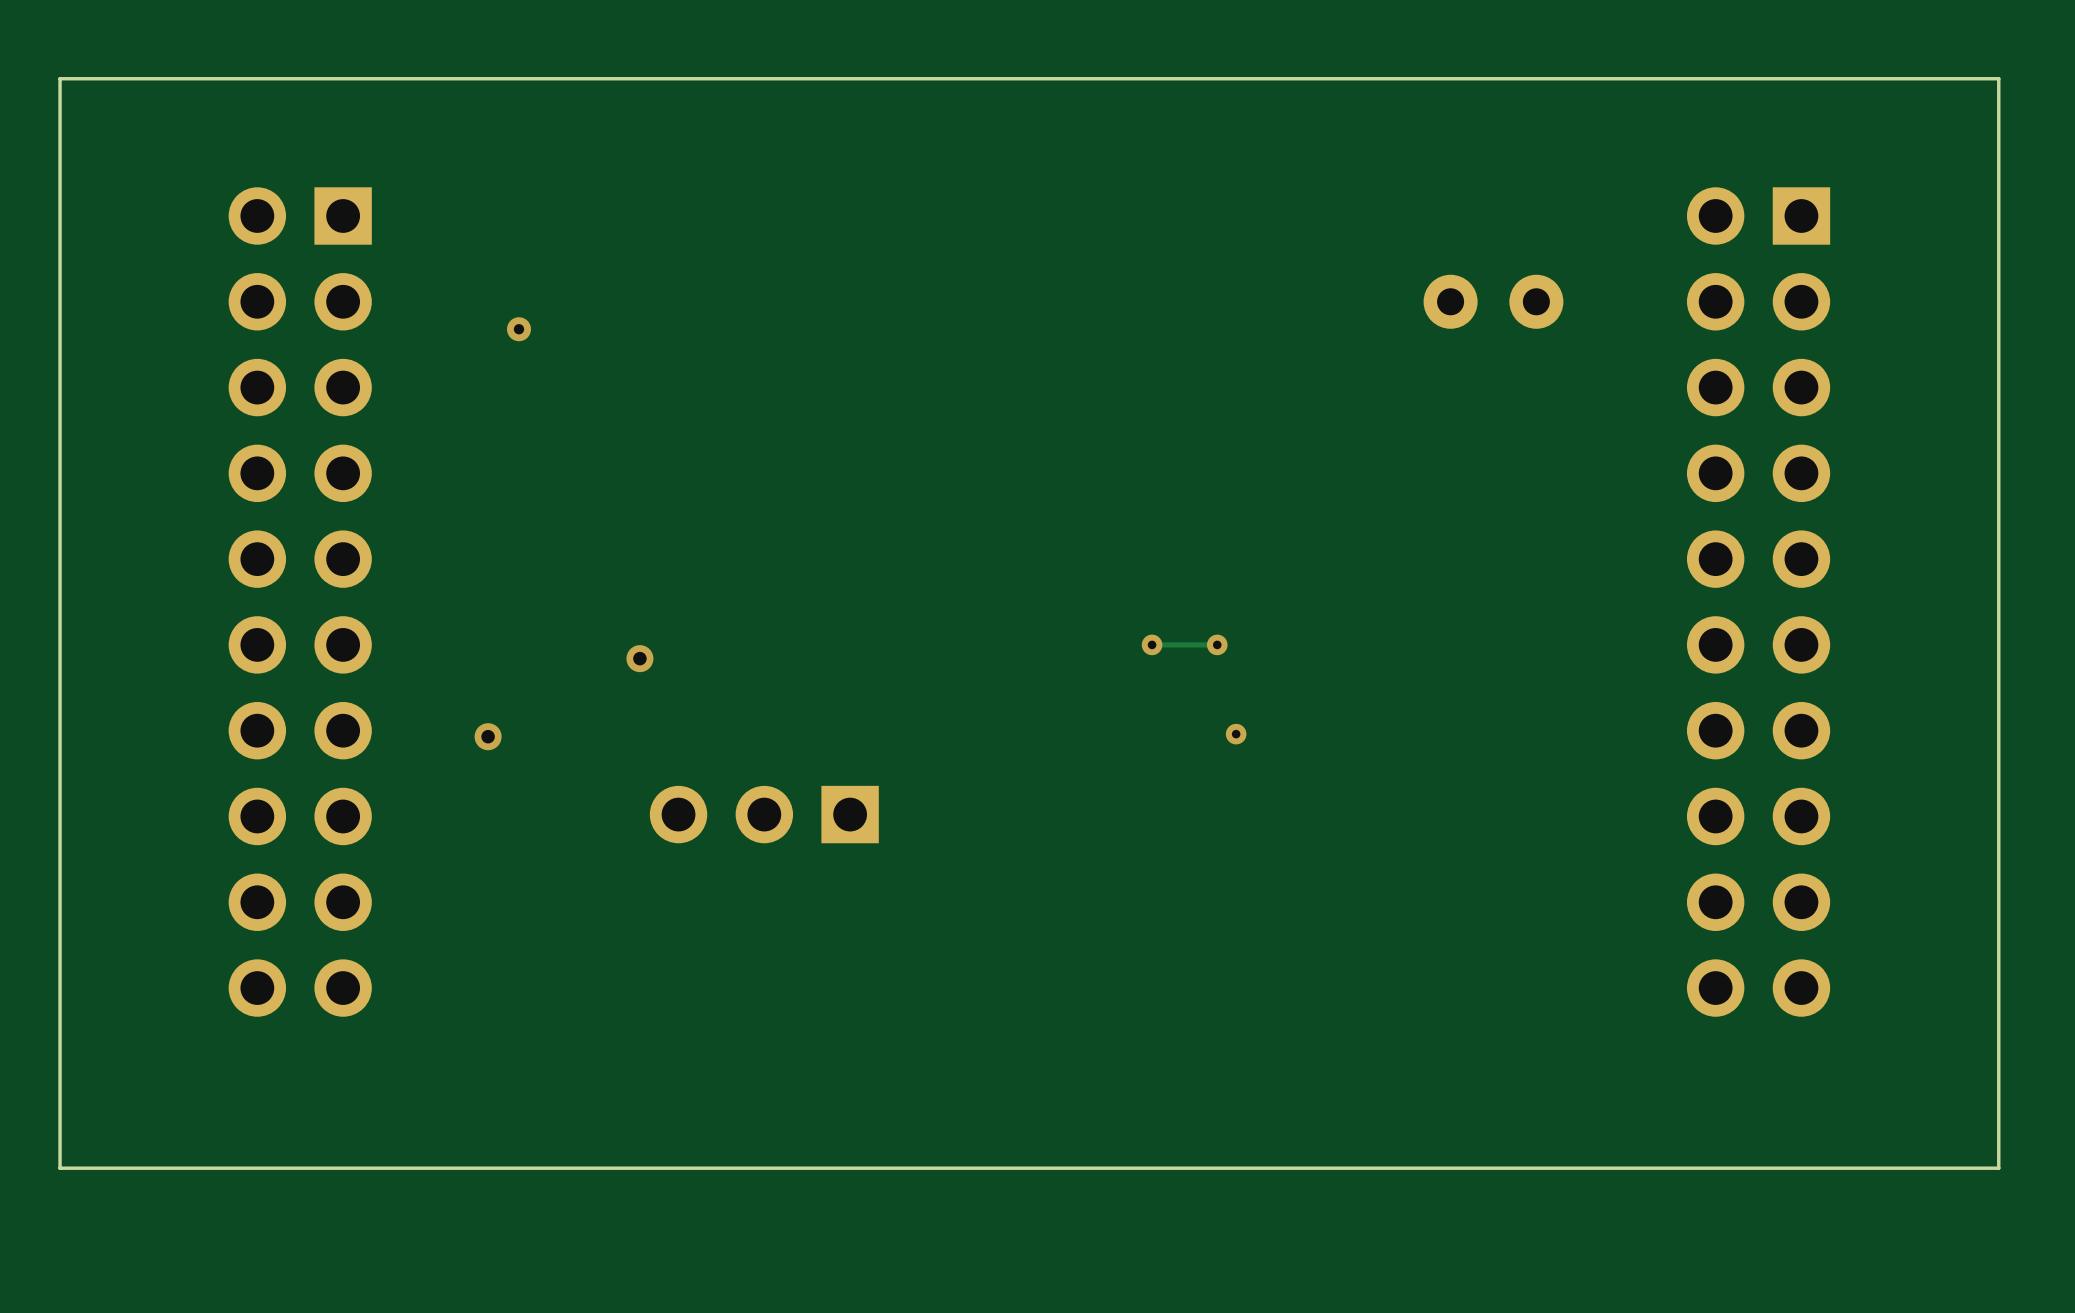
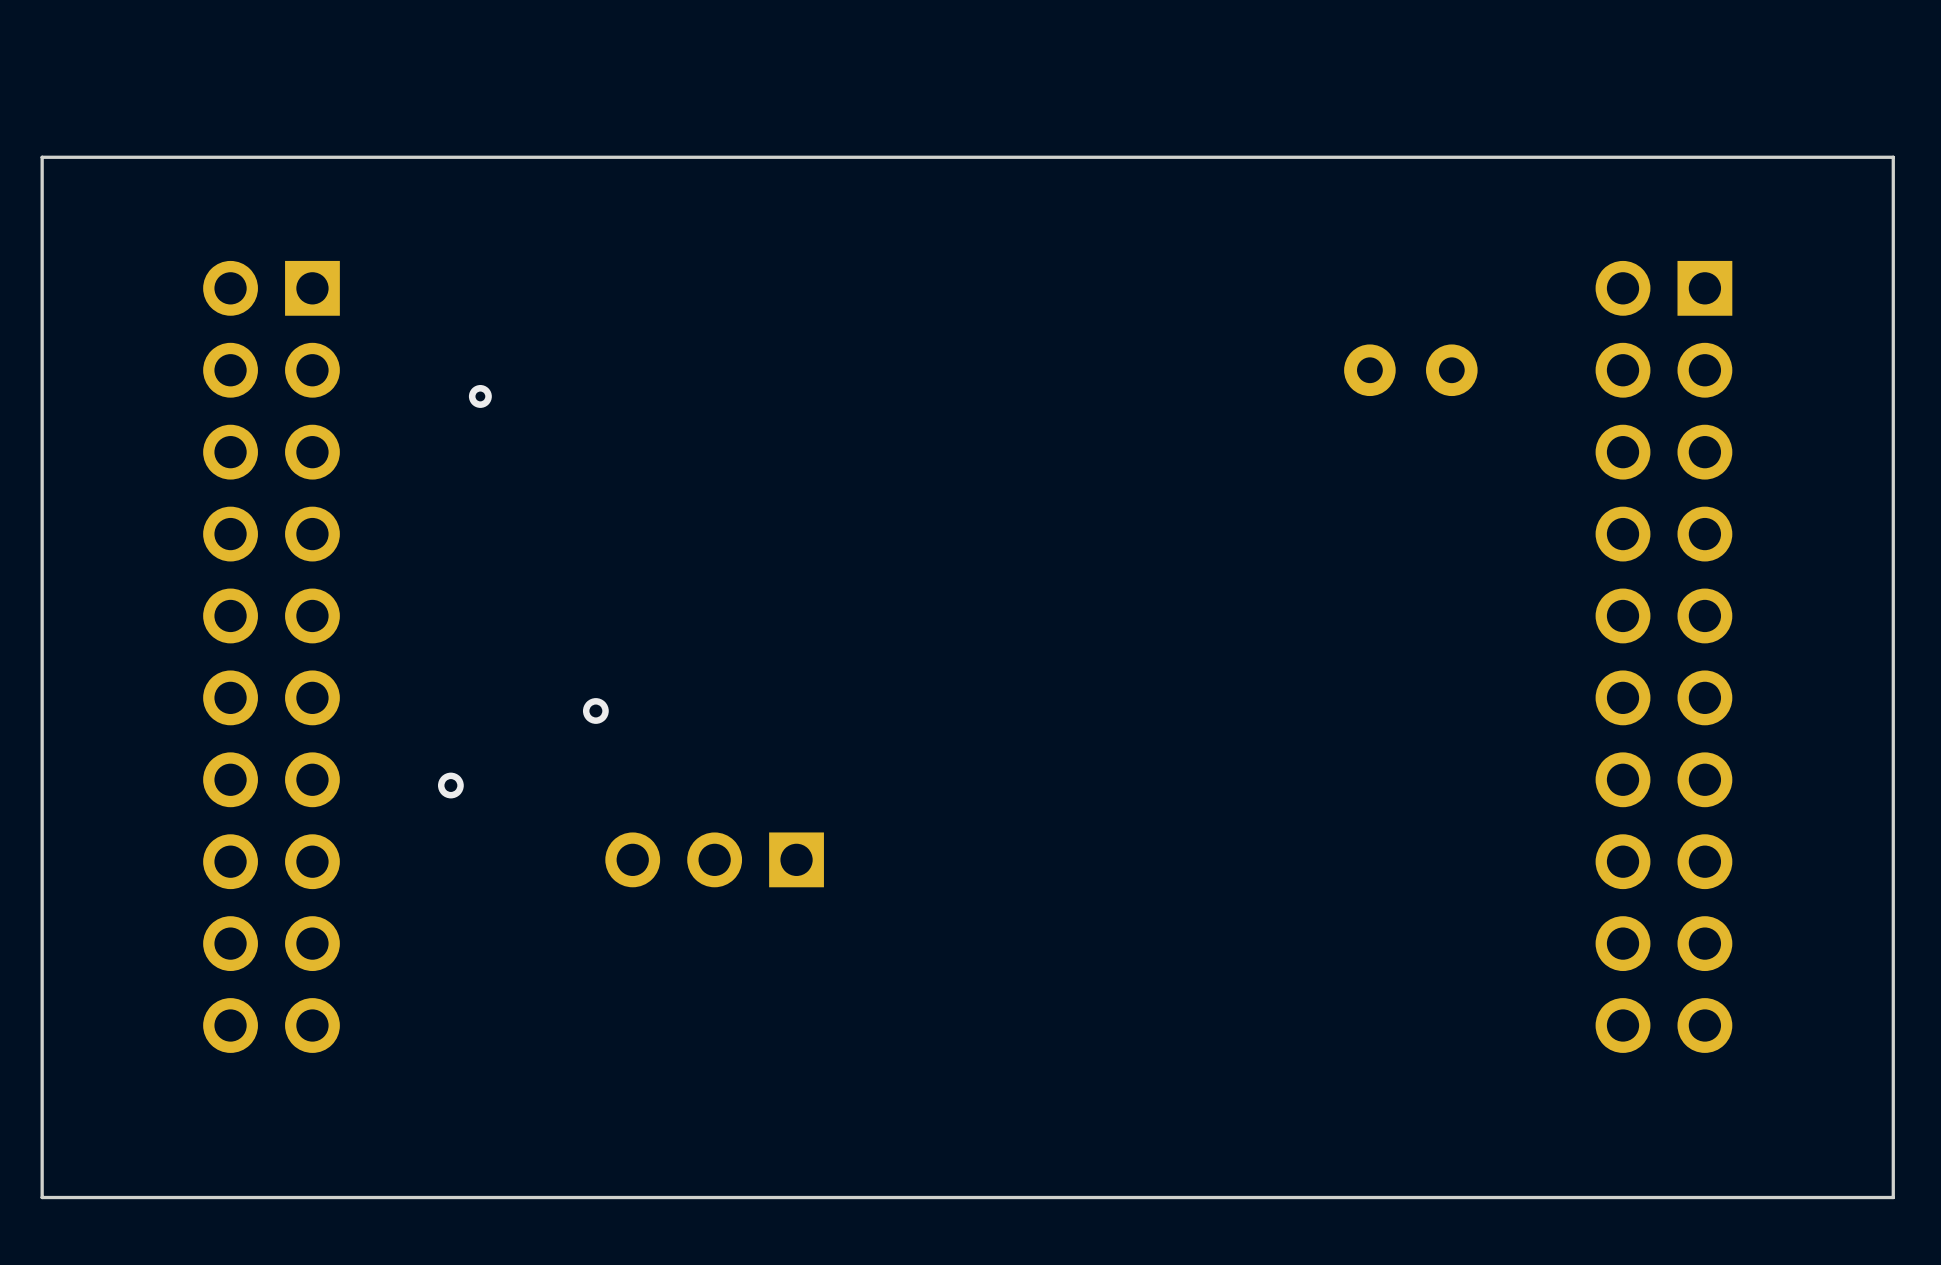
via: (1152, 644) -> none
track: (1217, 644) (1152, 644) -> none
via: (1217, 644) -> none
via: (1236, 734) -> none

